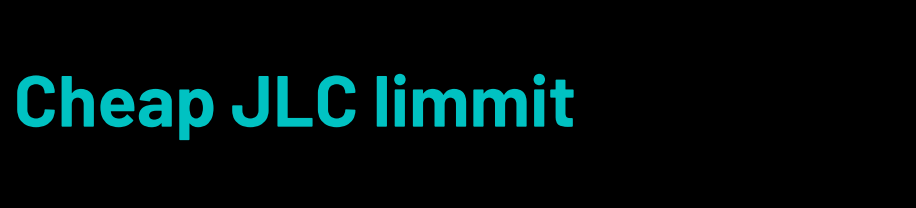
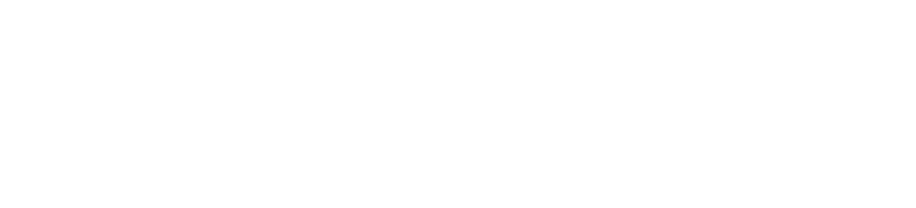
text: Cheap JLC limmit (295, 106) -> none

